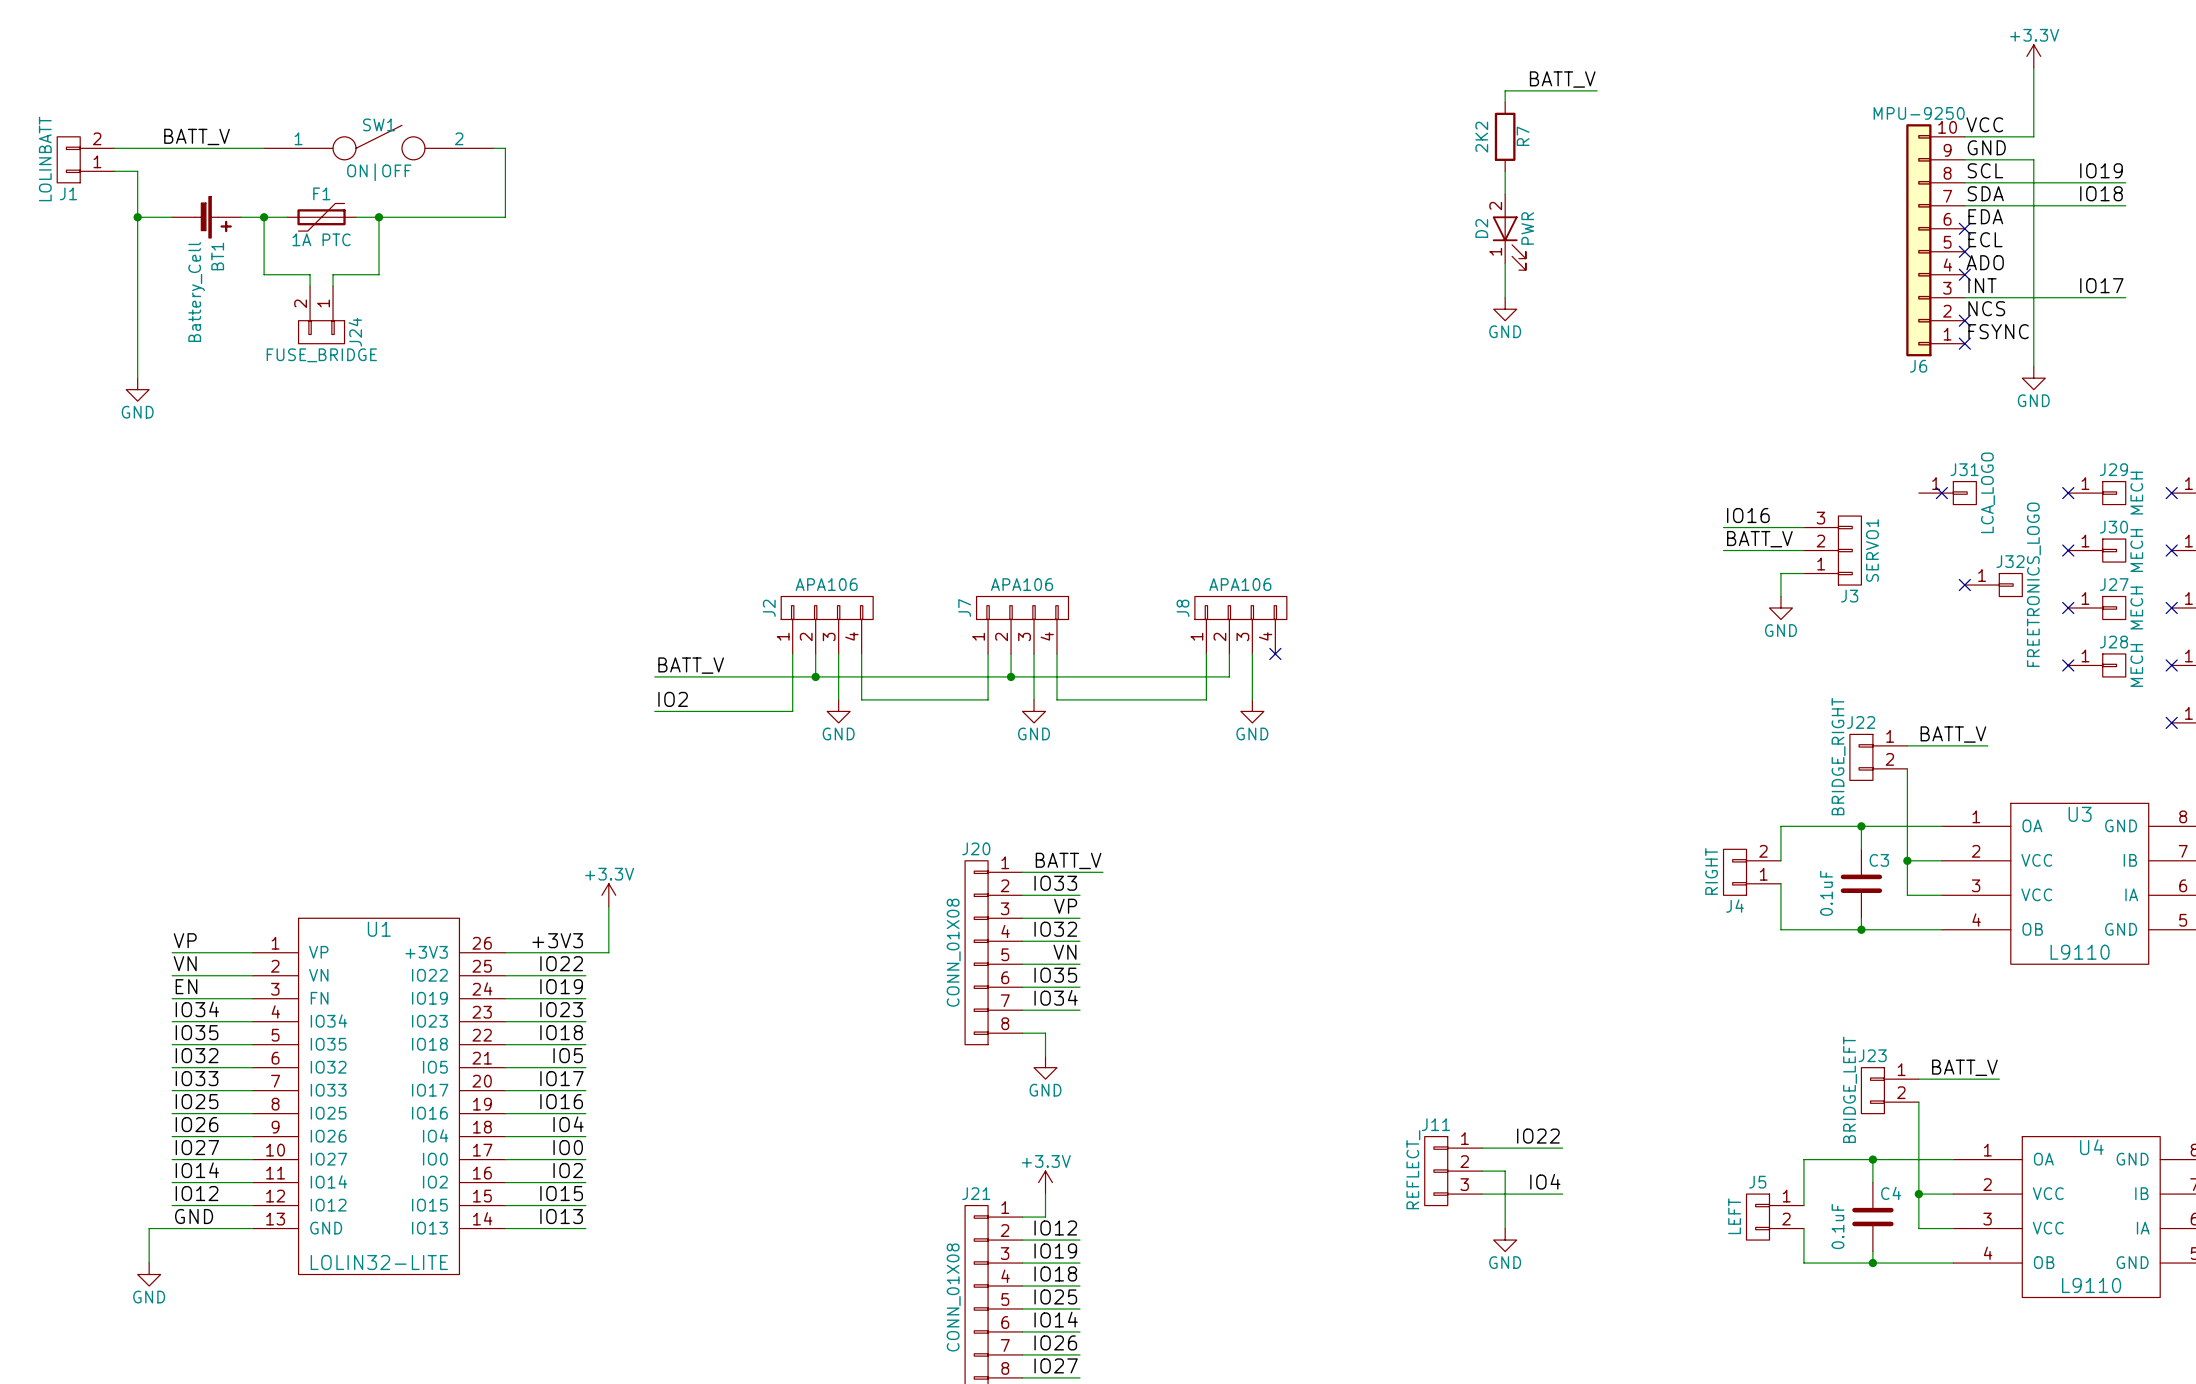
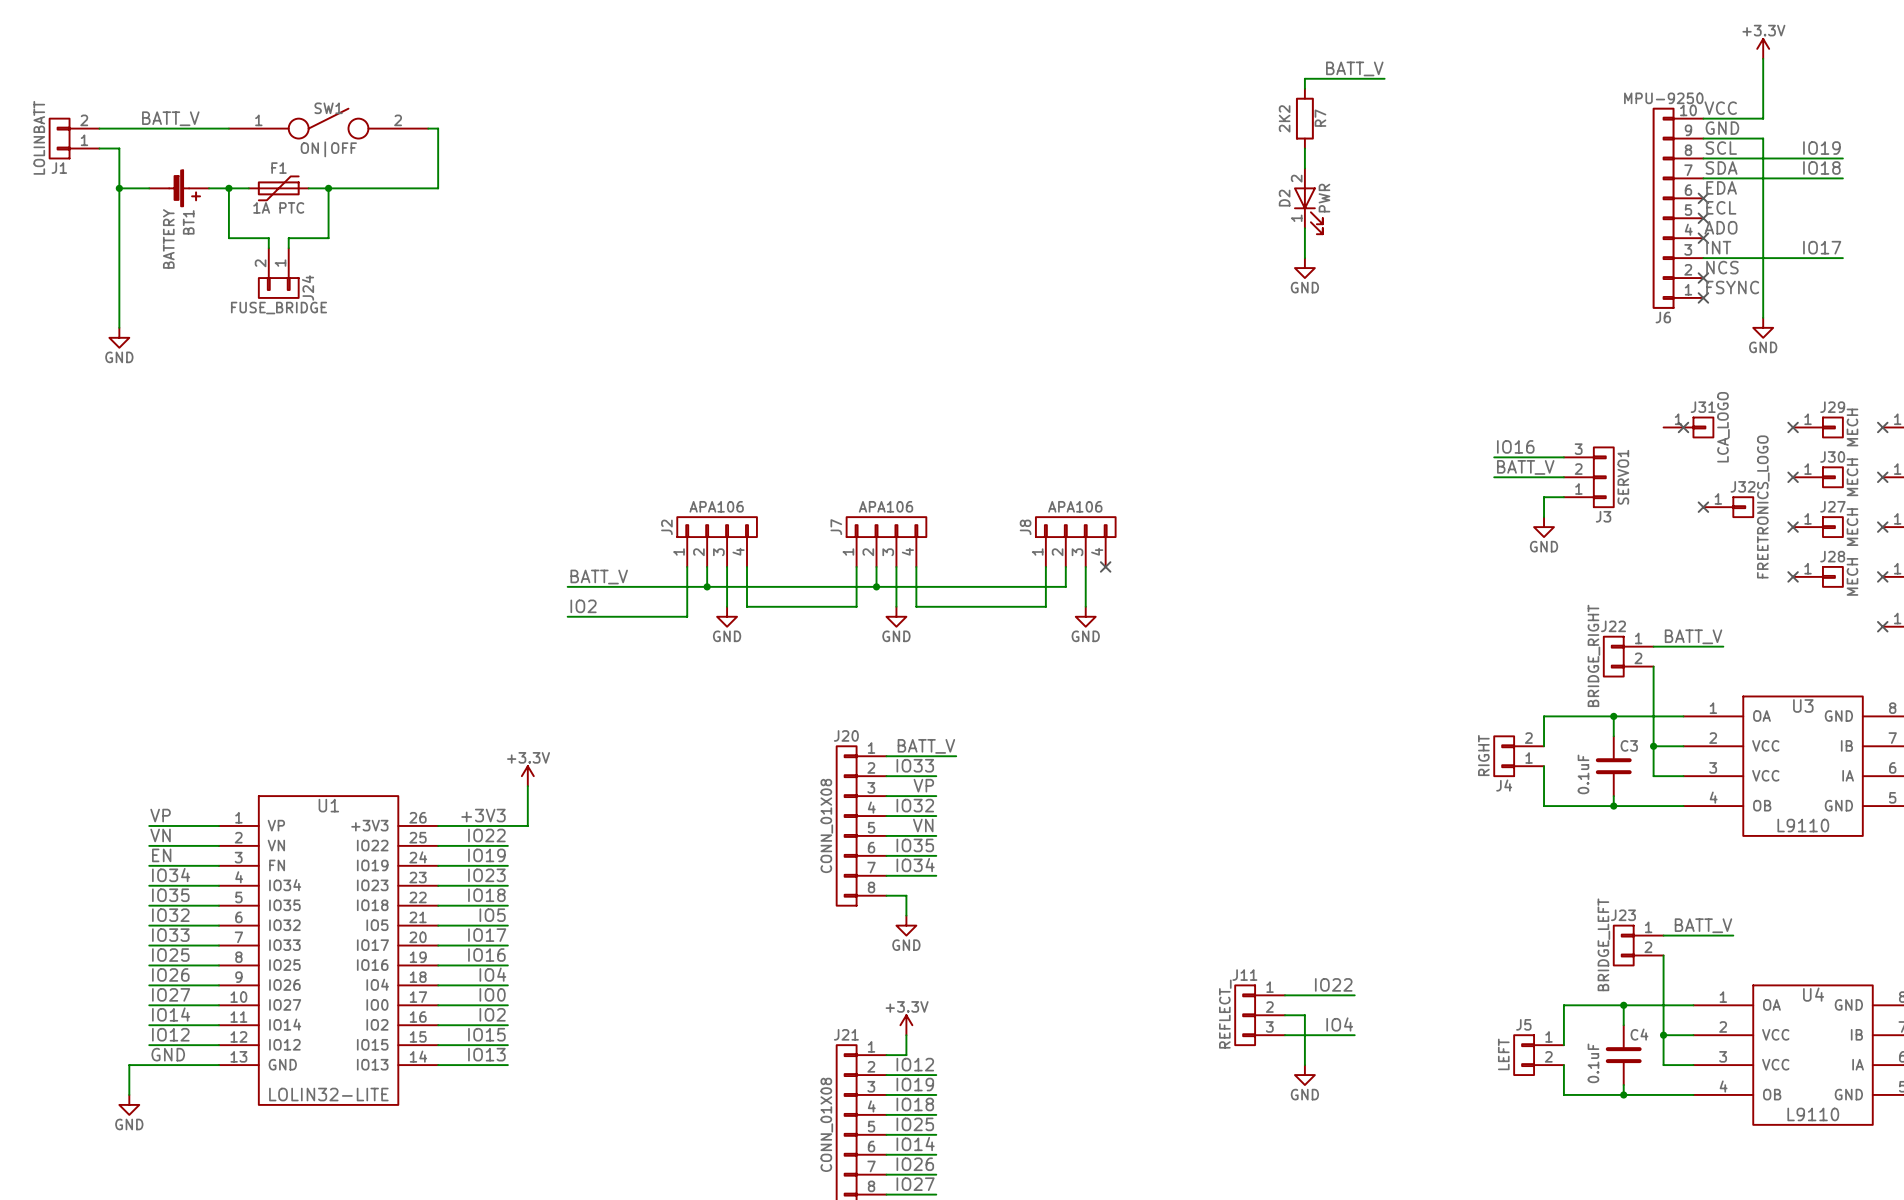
BT1 value: Battery_Cell (196, 292) -> BATTERY (168, 238)

